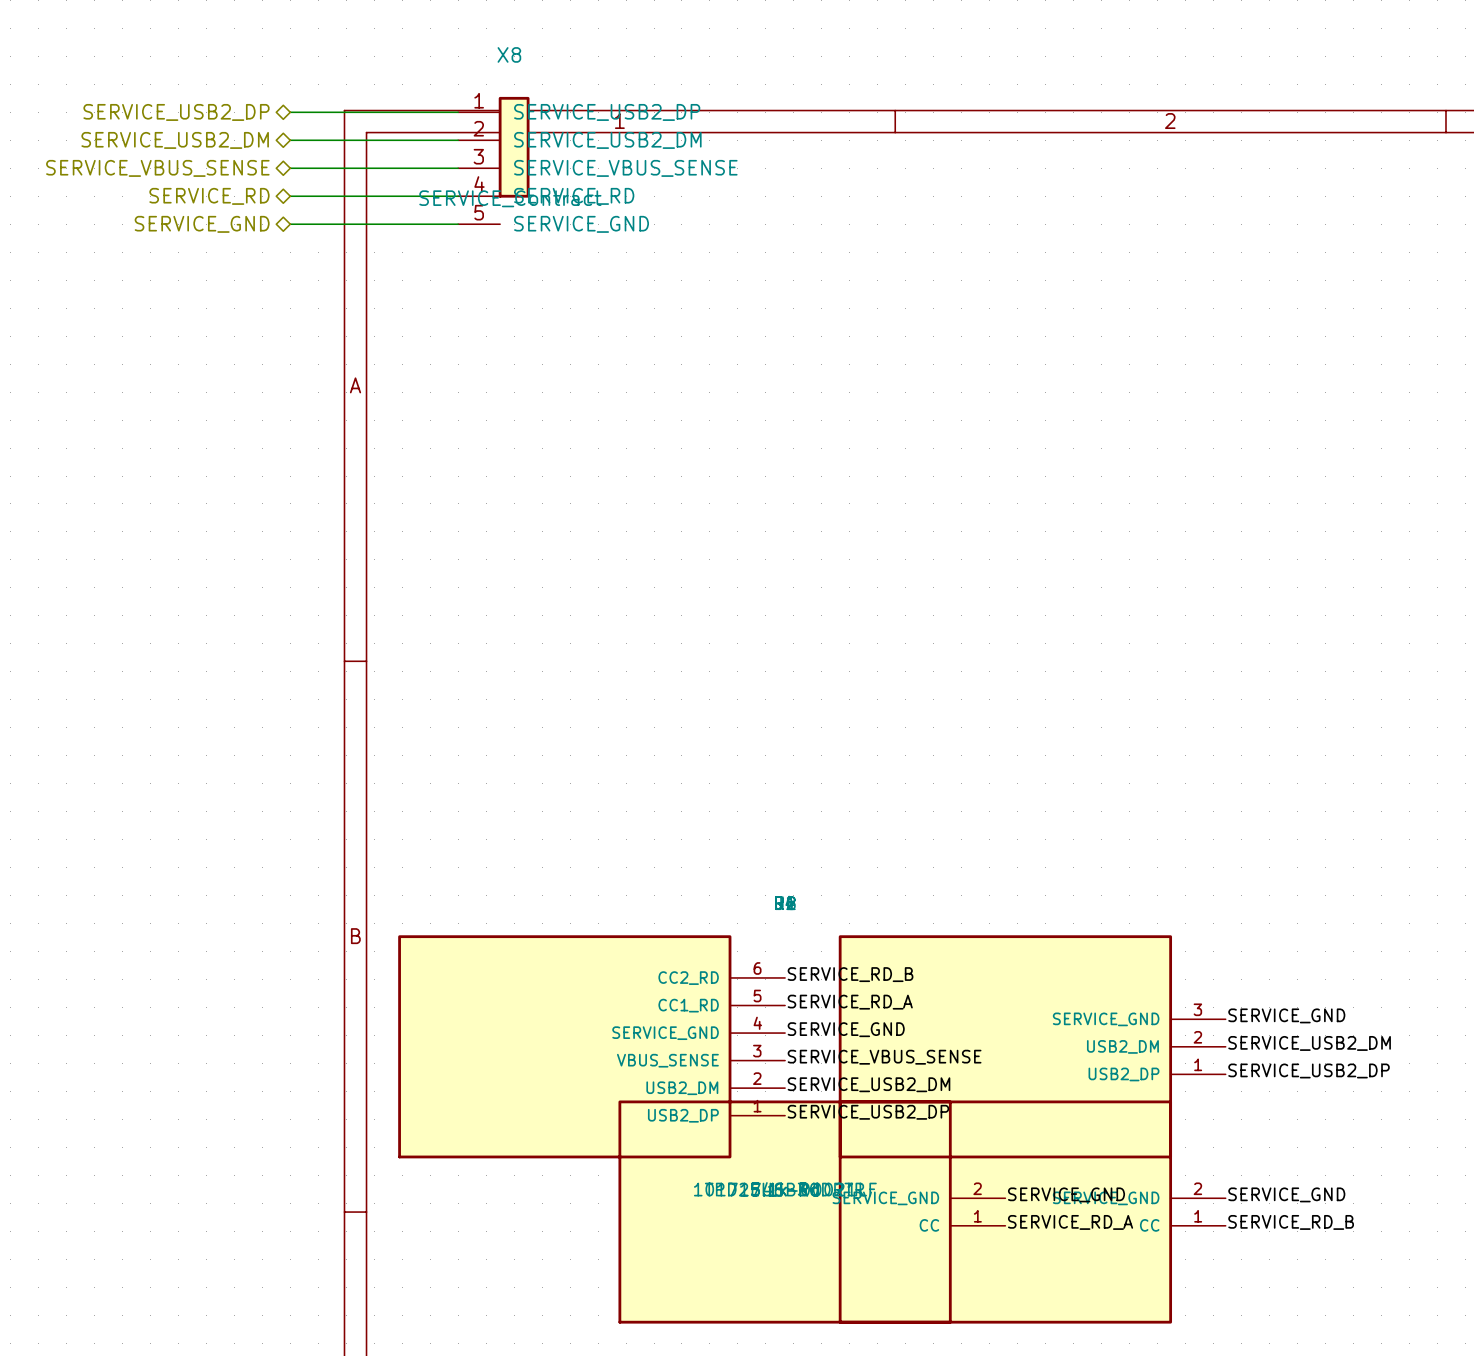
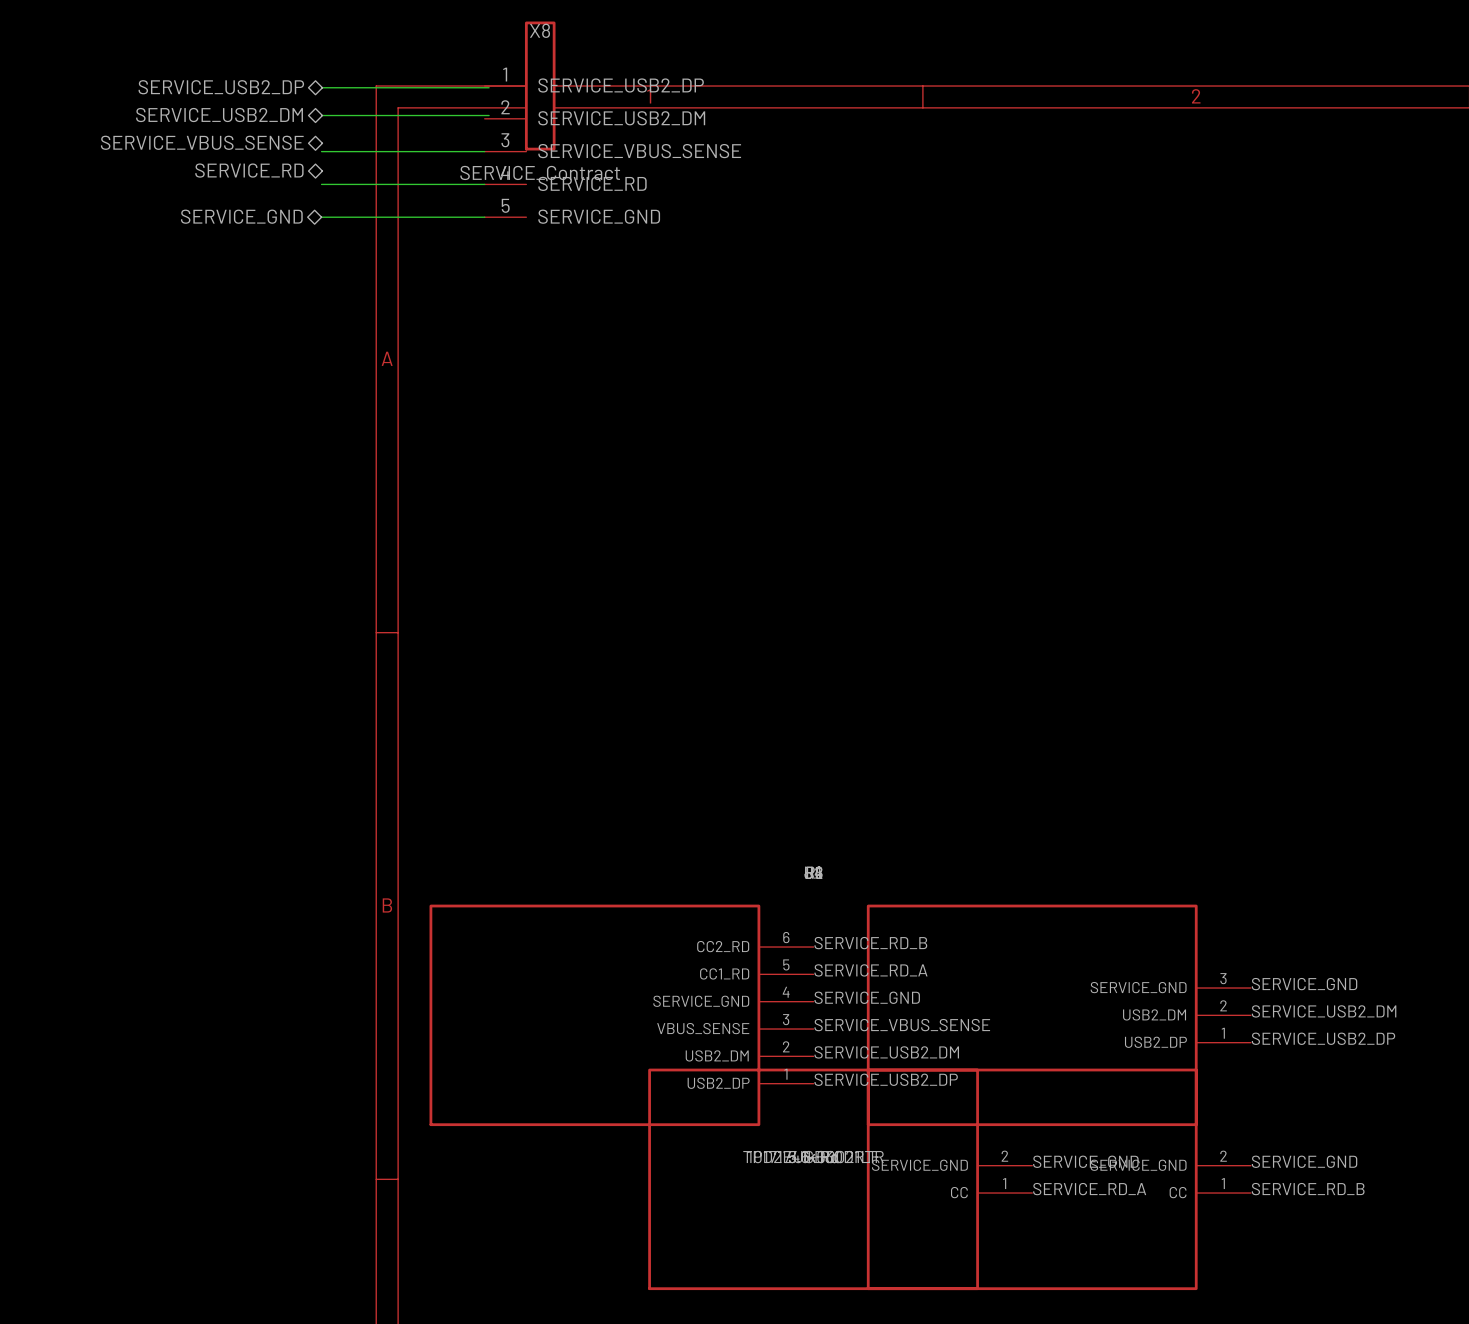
X8 symbol: [458, 96, 530, 225] -> [484, 21, 556, 218]
wire: (290, 168) (458, 168) -> none
wire: none -> (321, 151) (484, 151)
wire: (290, 196) (458, 196) -> none
wire: none -> (321, 184) (484, 184)
hierarchical label position: SERVICE_GND (202, 224) -> SERVICE_GND (241, 216)
wire: (290, 224) (458, 224) -> none
wire: none -> (321, 217) (484, 217)

